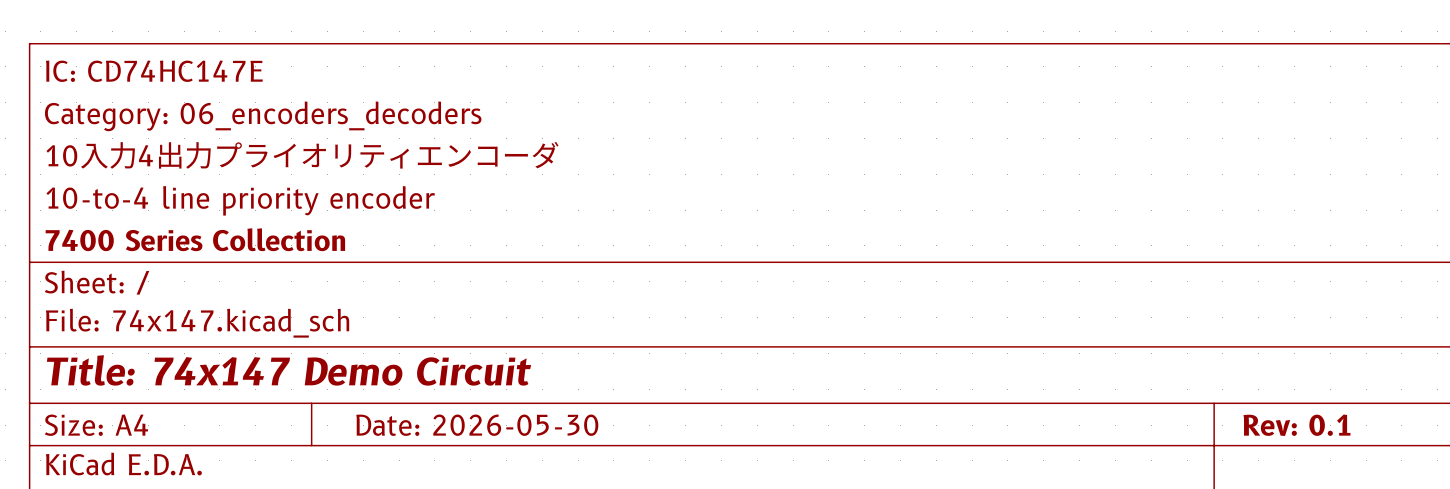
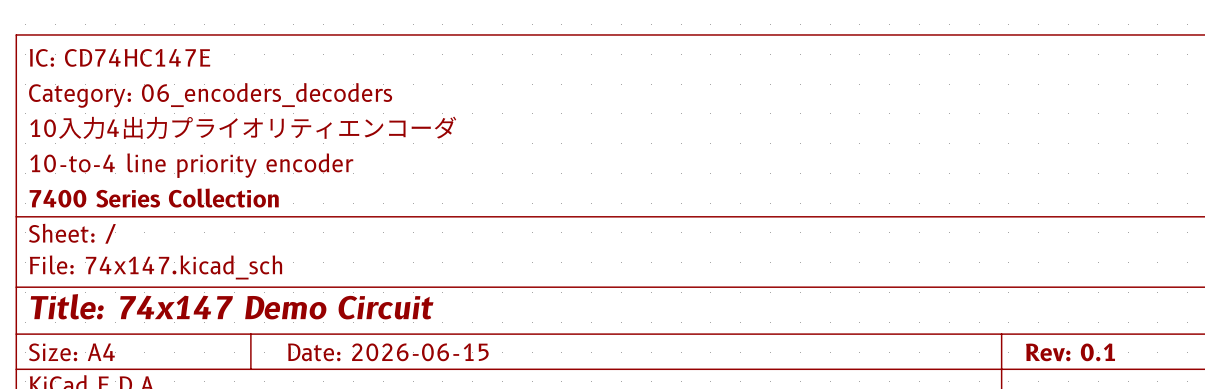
title block: Date: 2026-05-30 (477, 425) -> Date: 2026-06-15 (388, 352)

